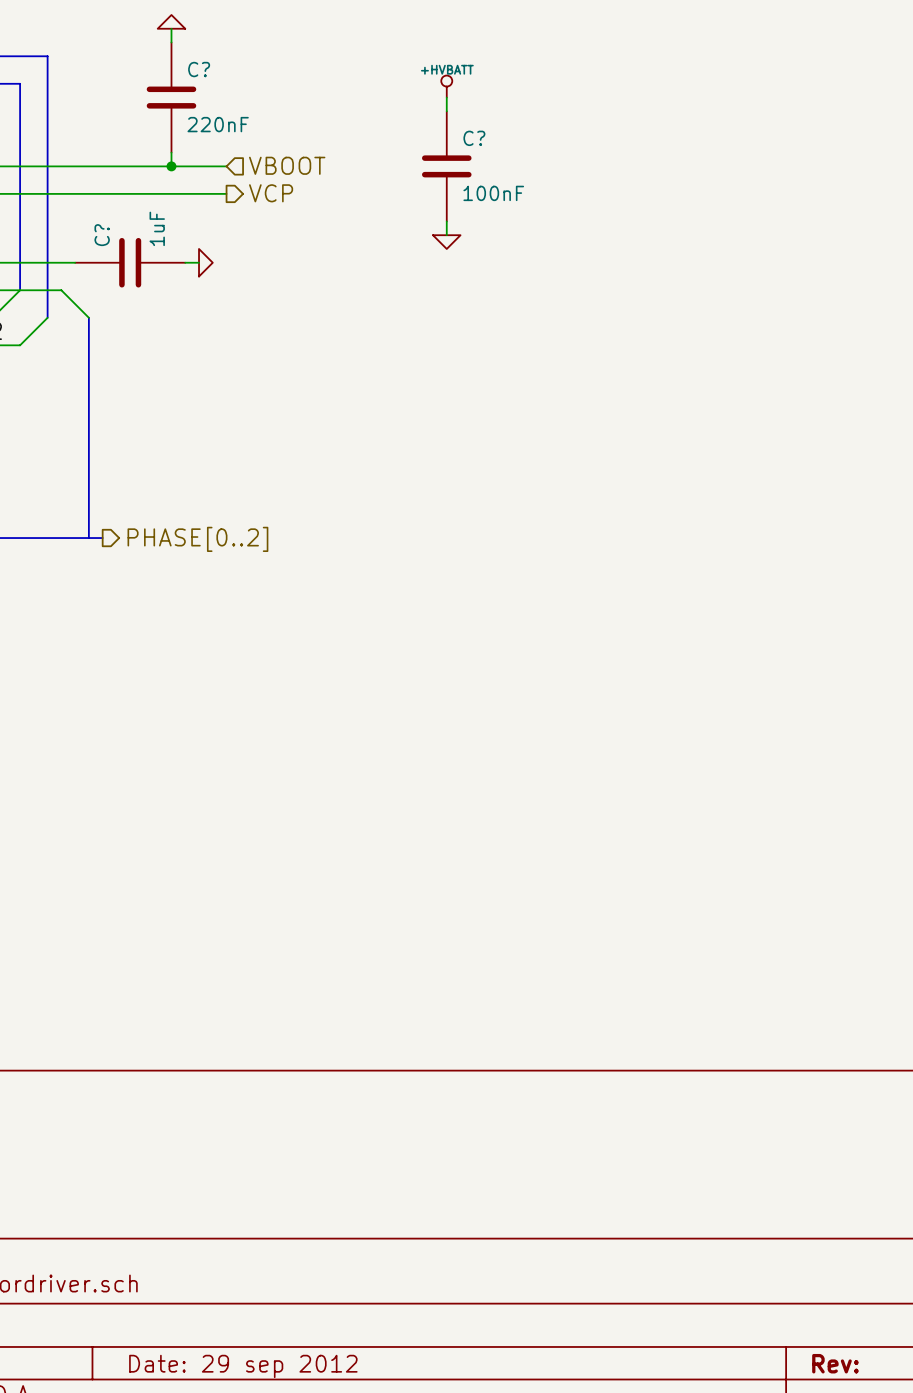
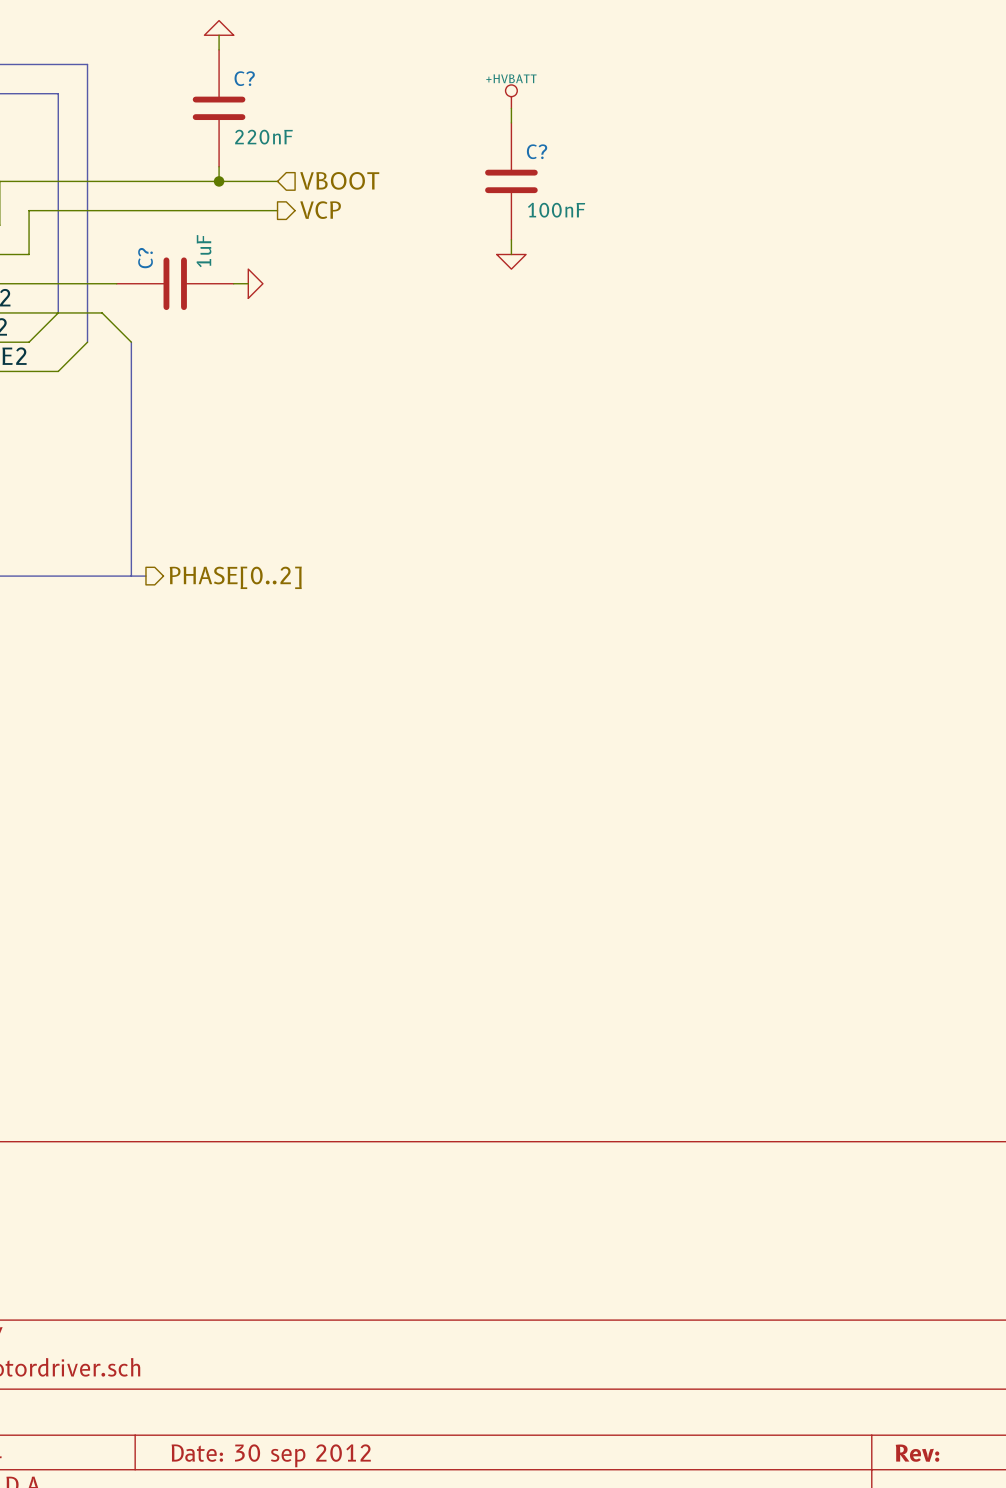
title block: Date: 29 sep 2012 (243, 1366) -> Date: 30 sep 2012 (271, 1455)

